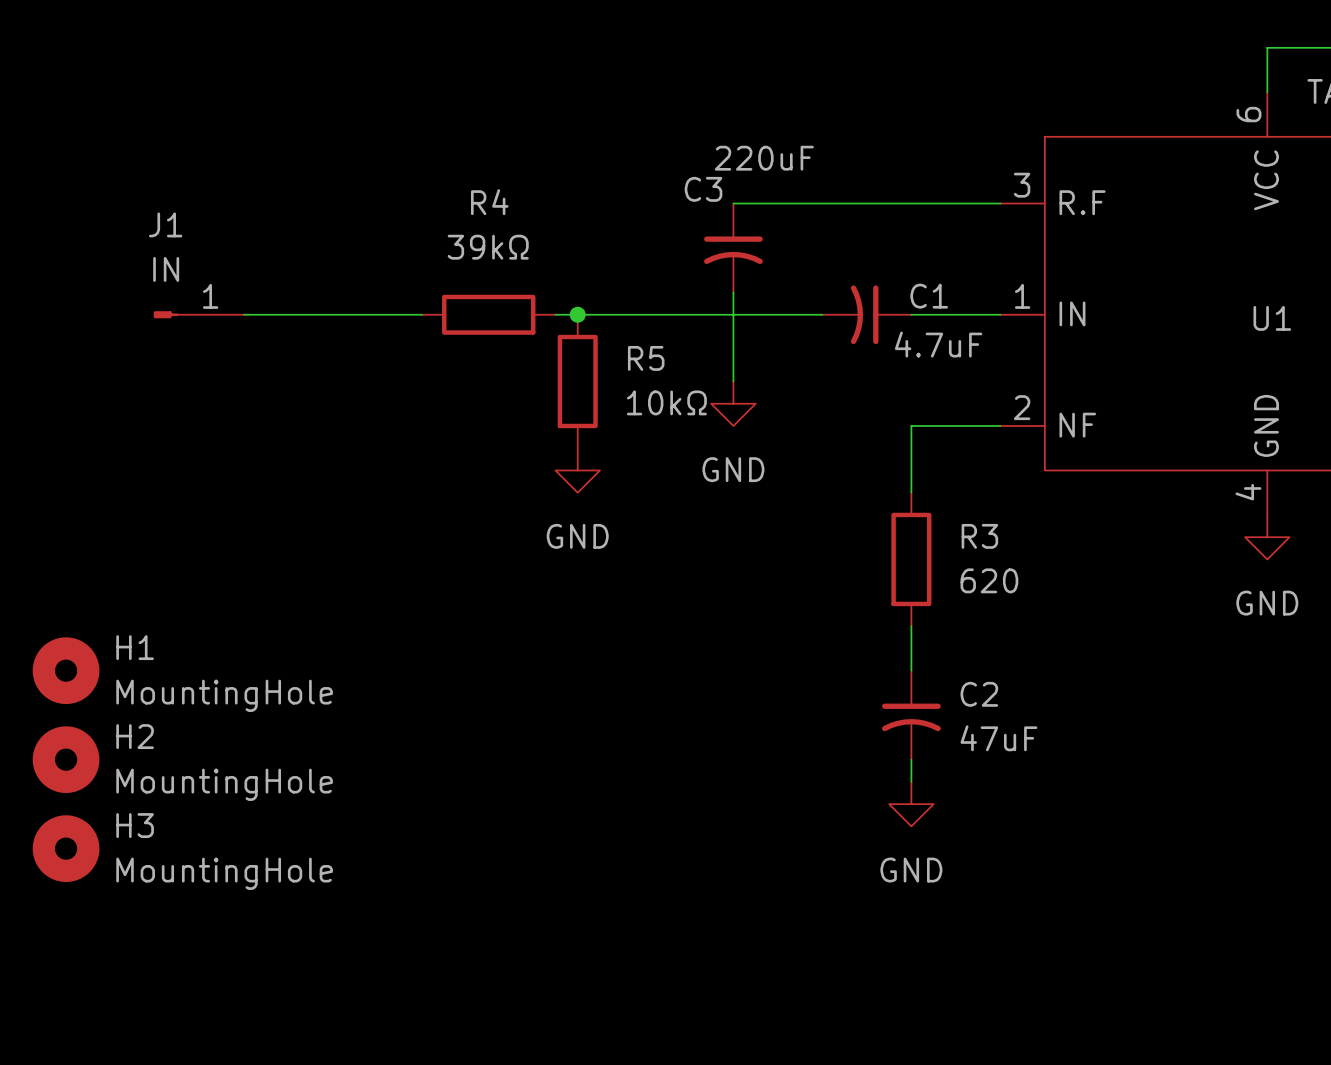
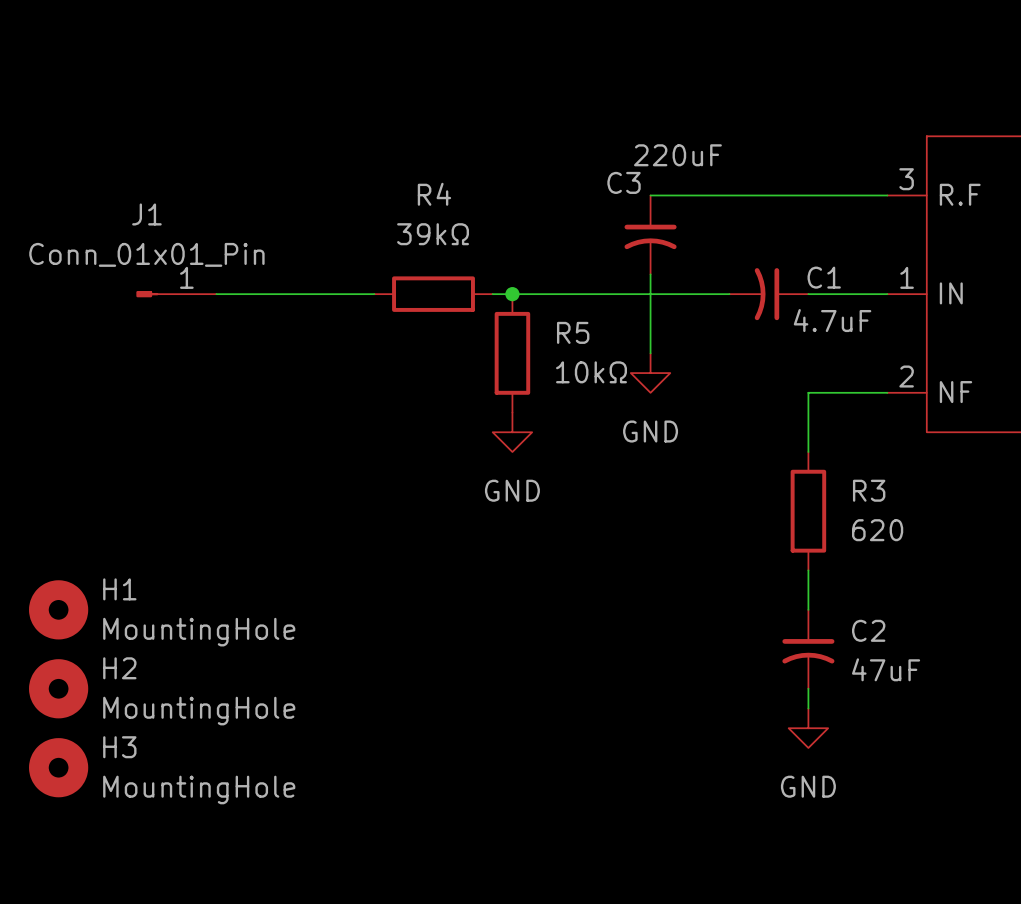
J1 value: IN (166, 269) -> Conn_01x01_Pin (146, 254)

